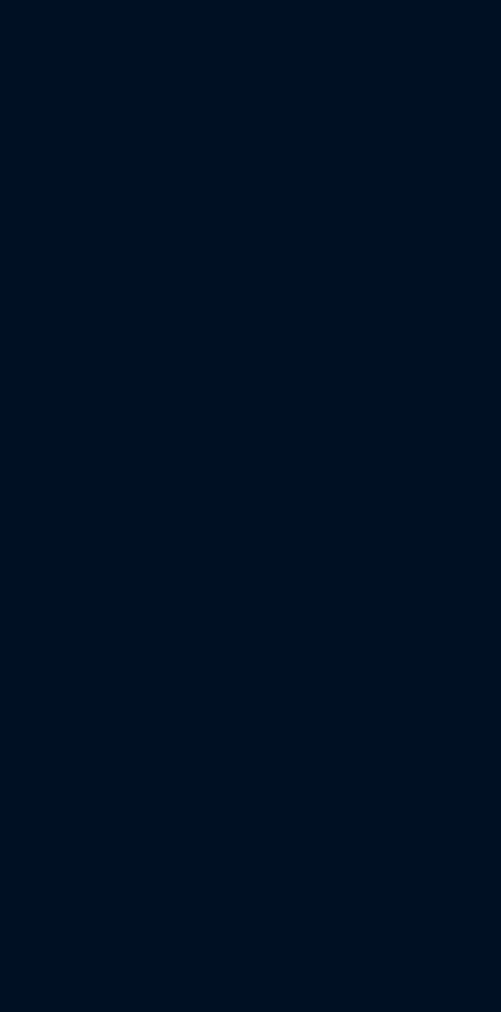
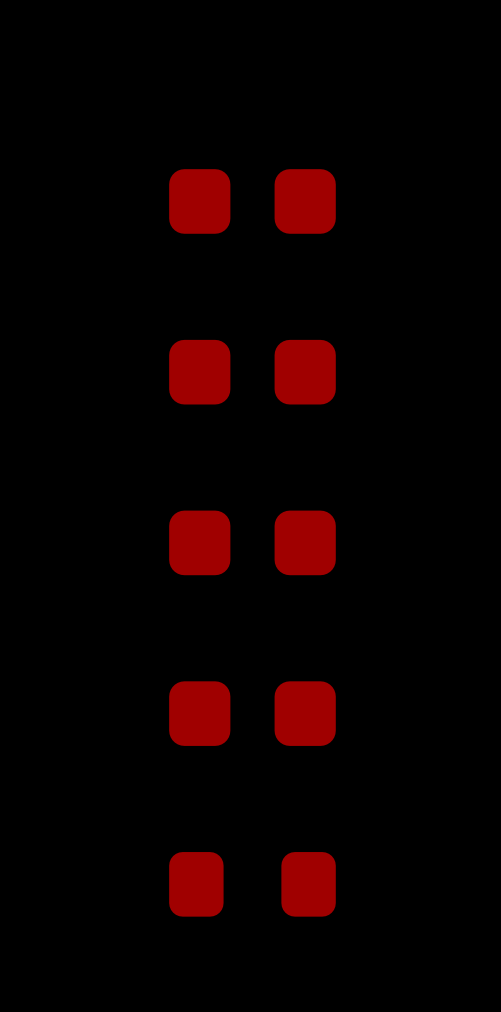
part: none -> (252, 201)
part: none -> (252, 372)
part: none -> (252, 542)
part: none -> (252, 713)
part: none -> (252, 884)

